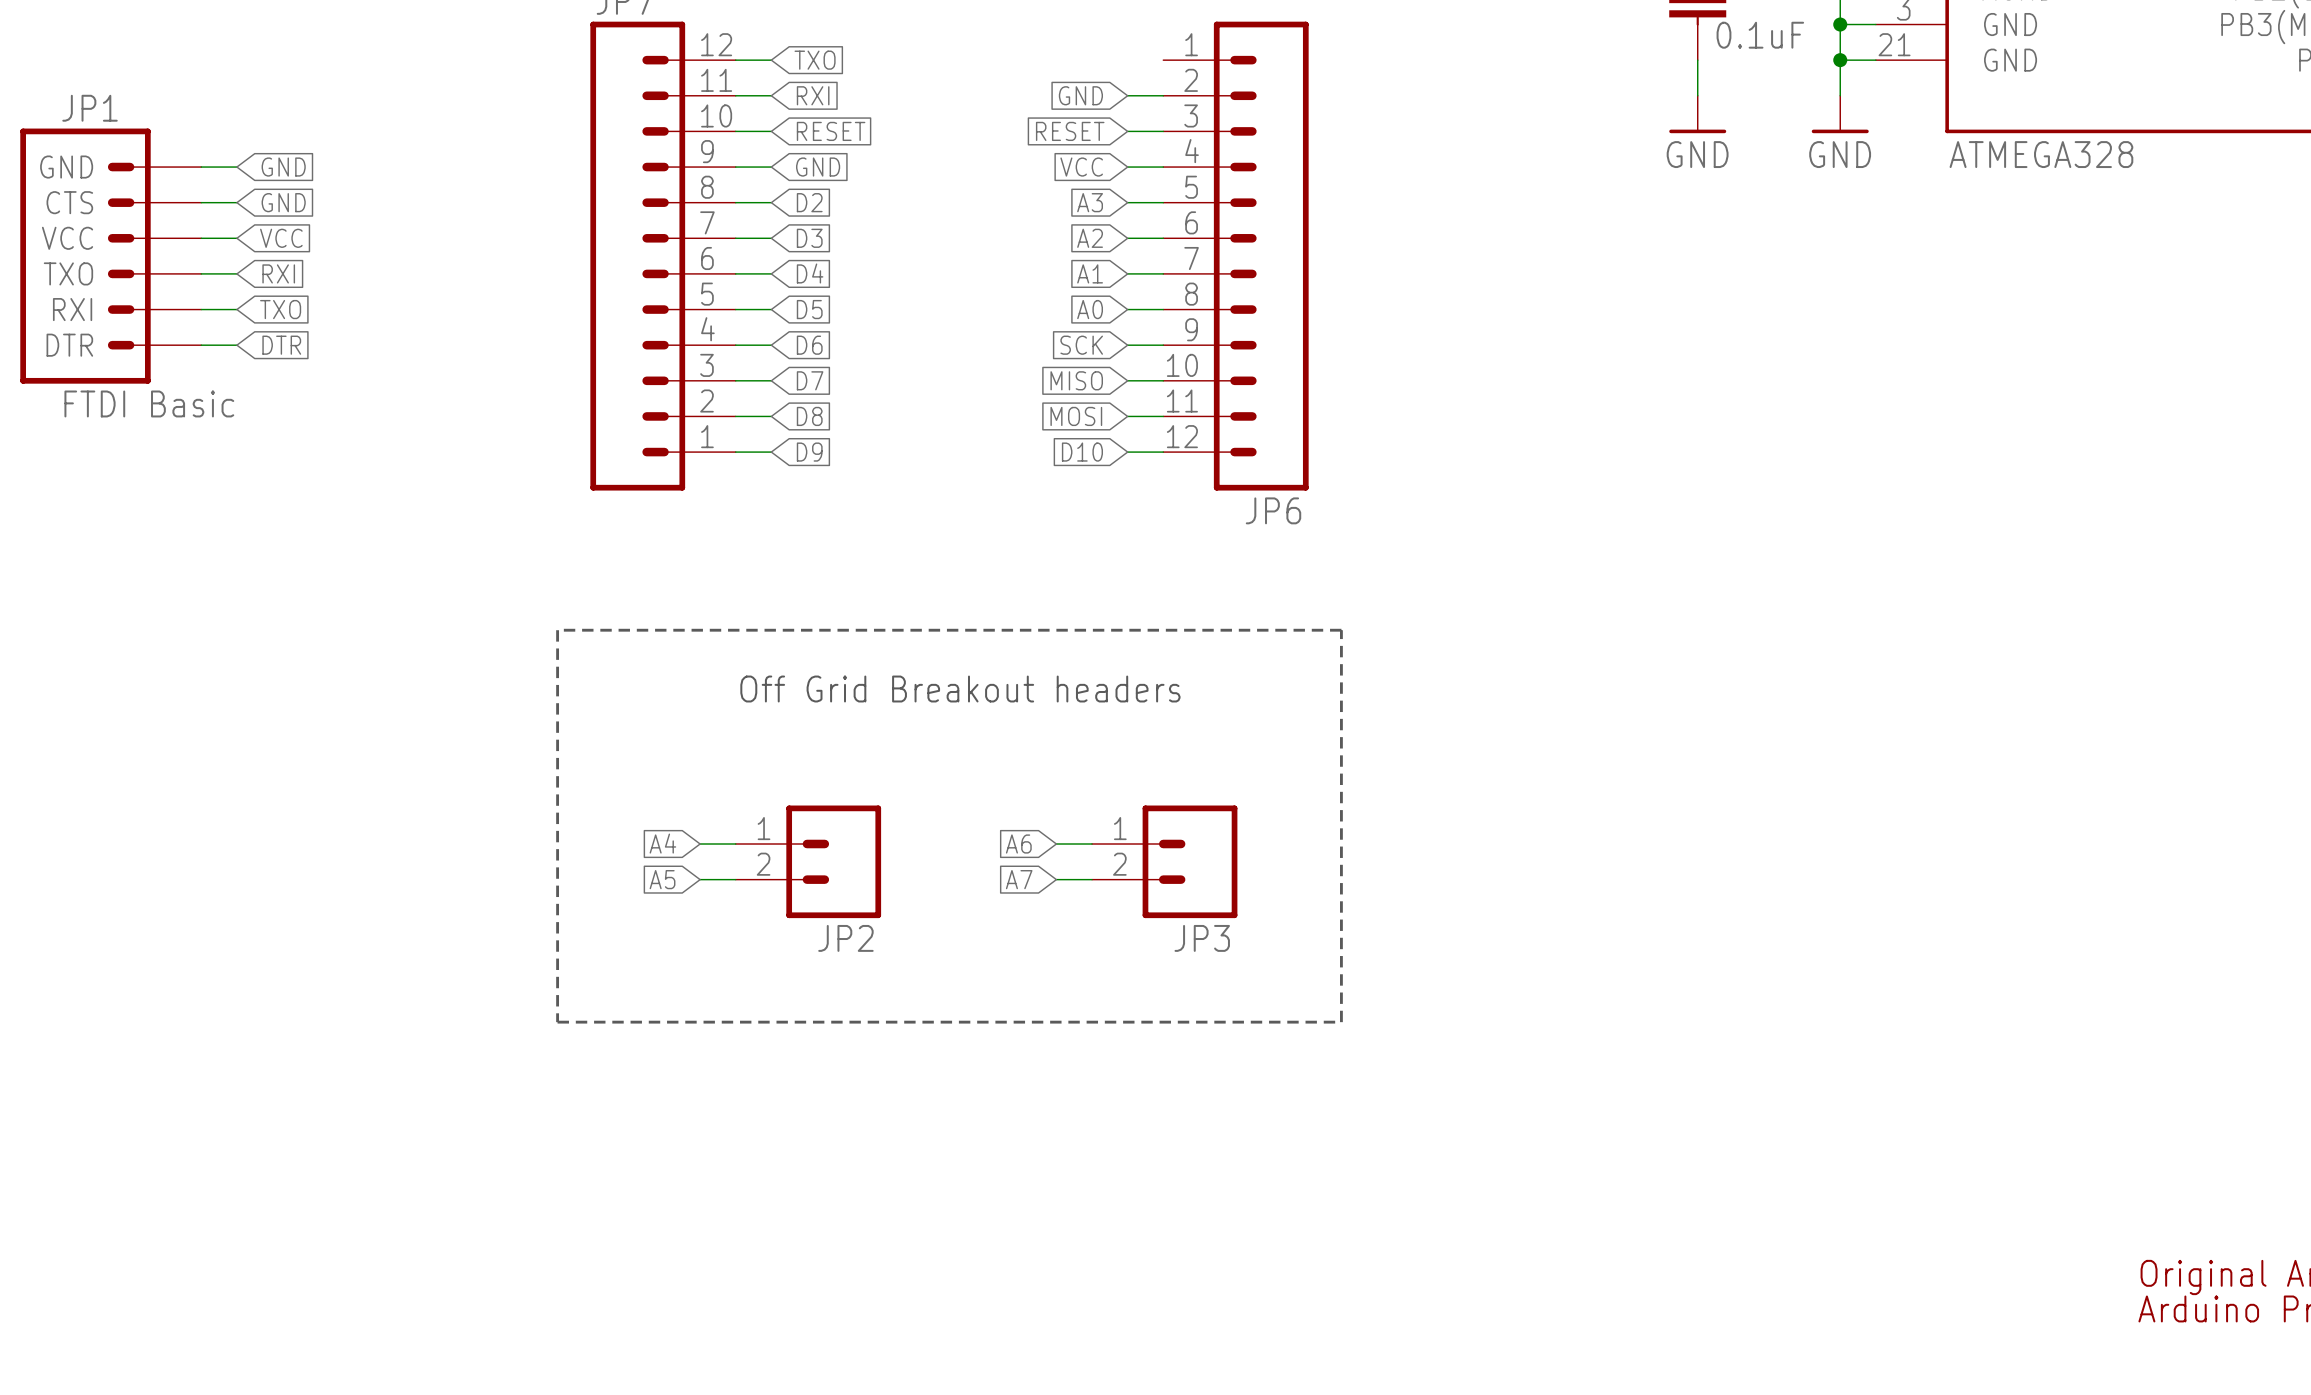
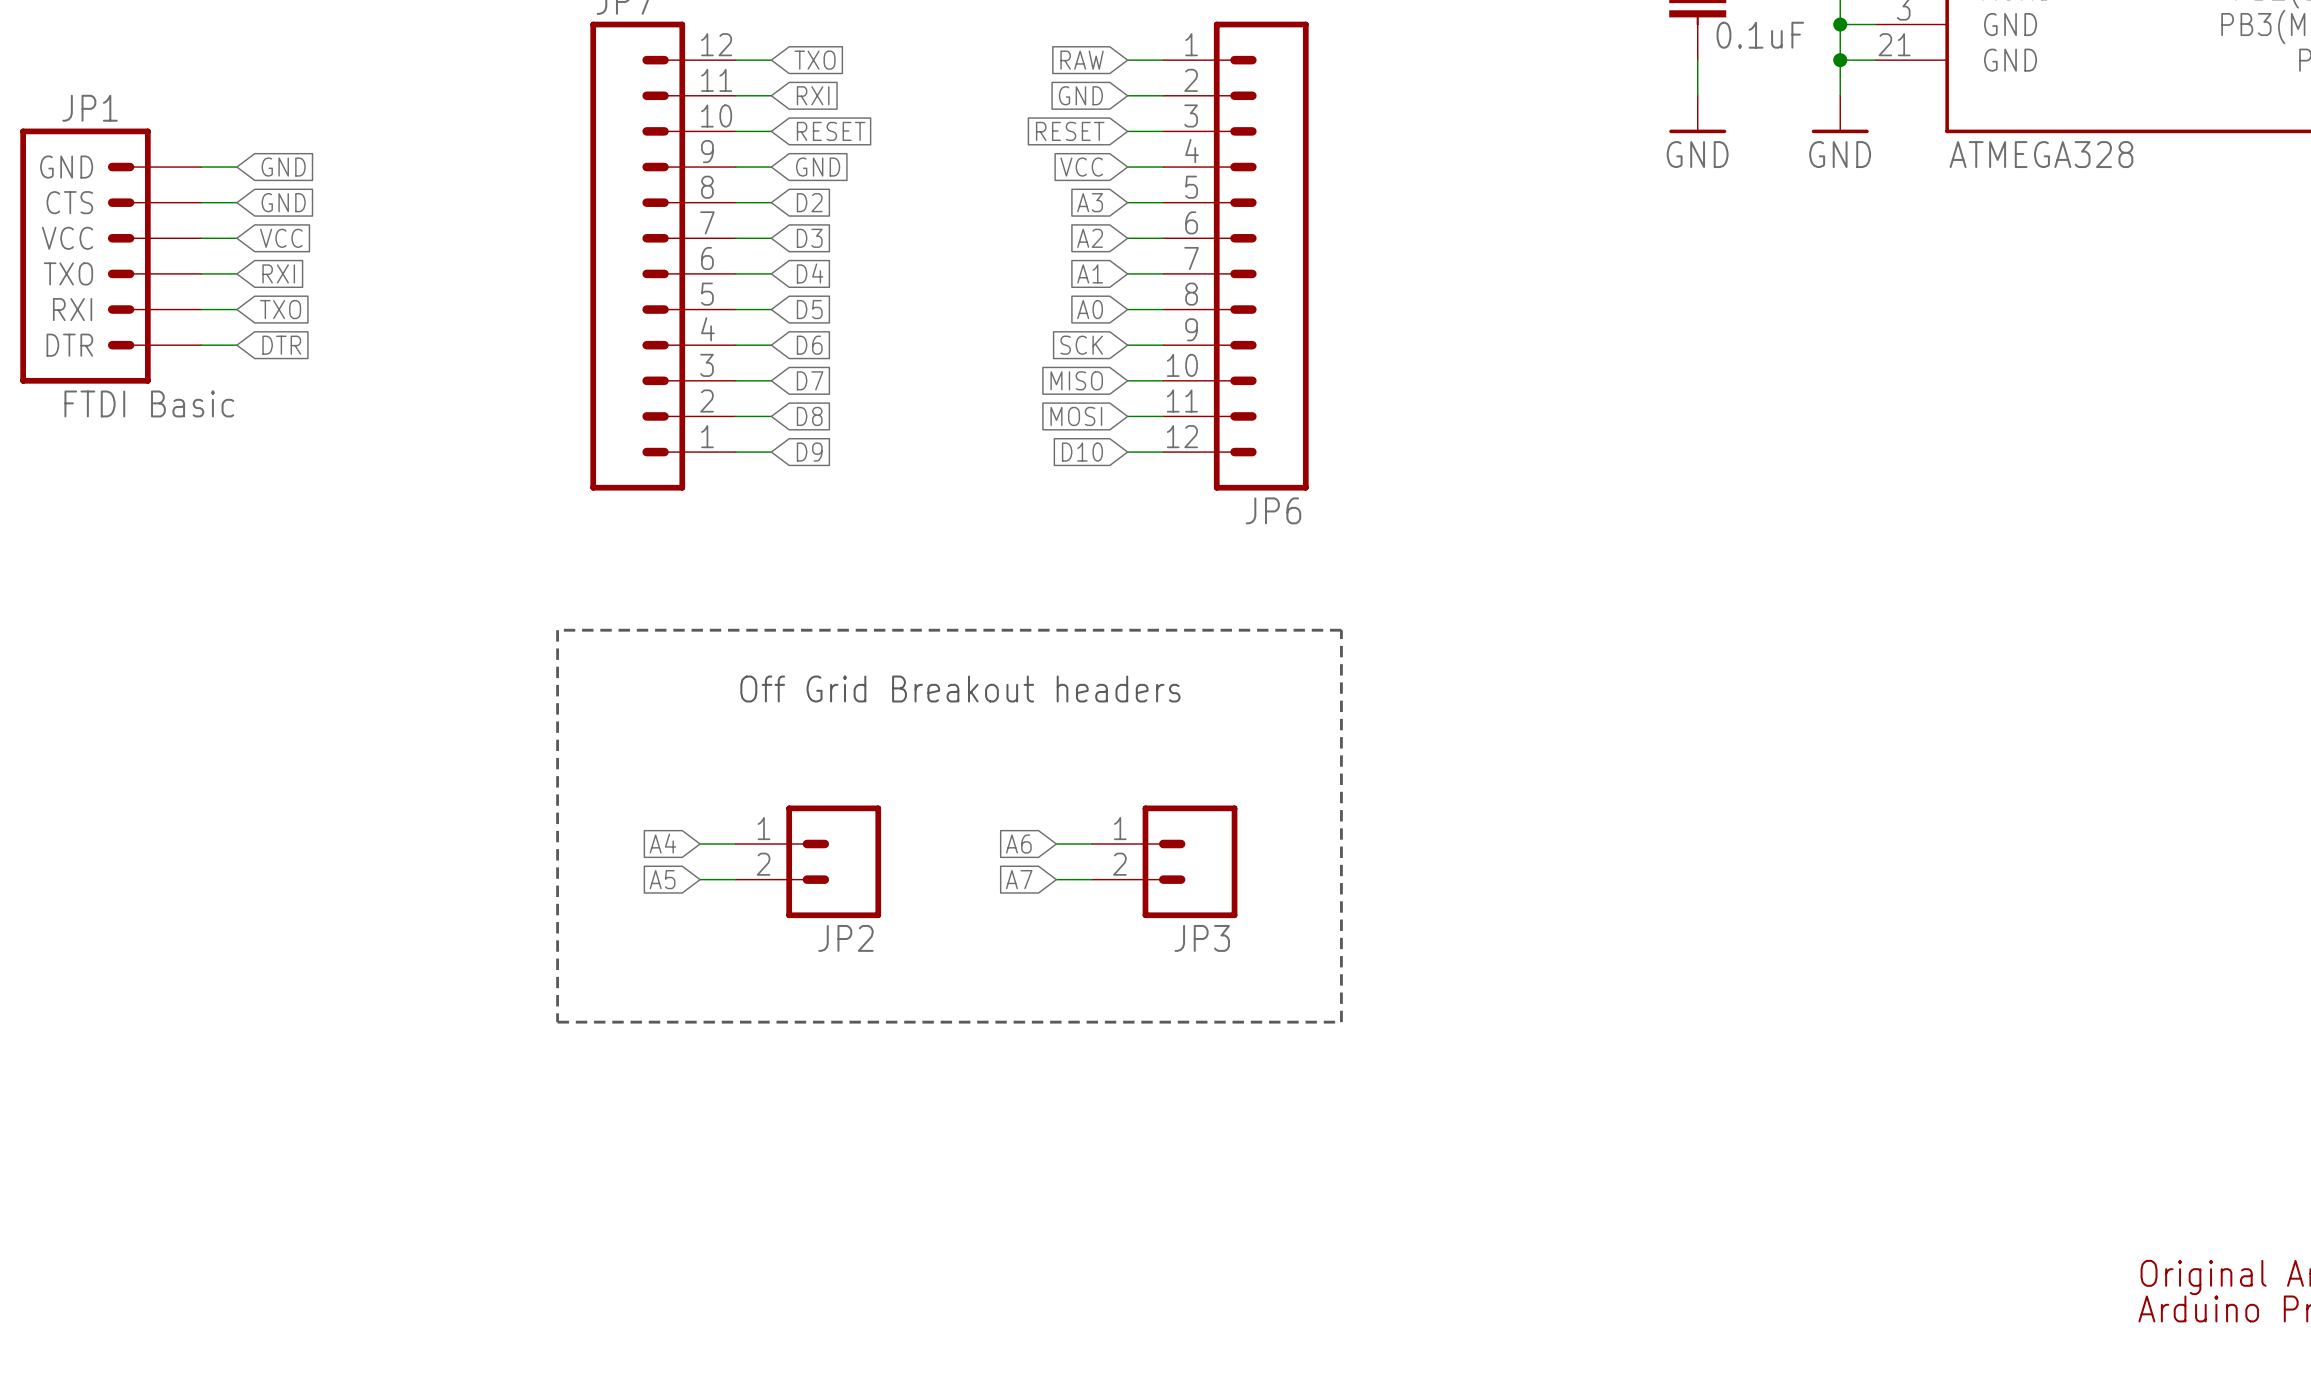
global label: none -> RAW (1082, 60)
wire: none -> (1127, 60) (1163, 60)

